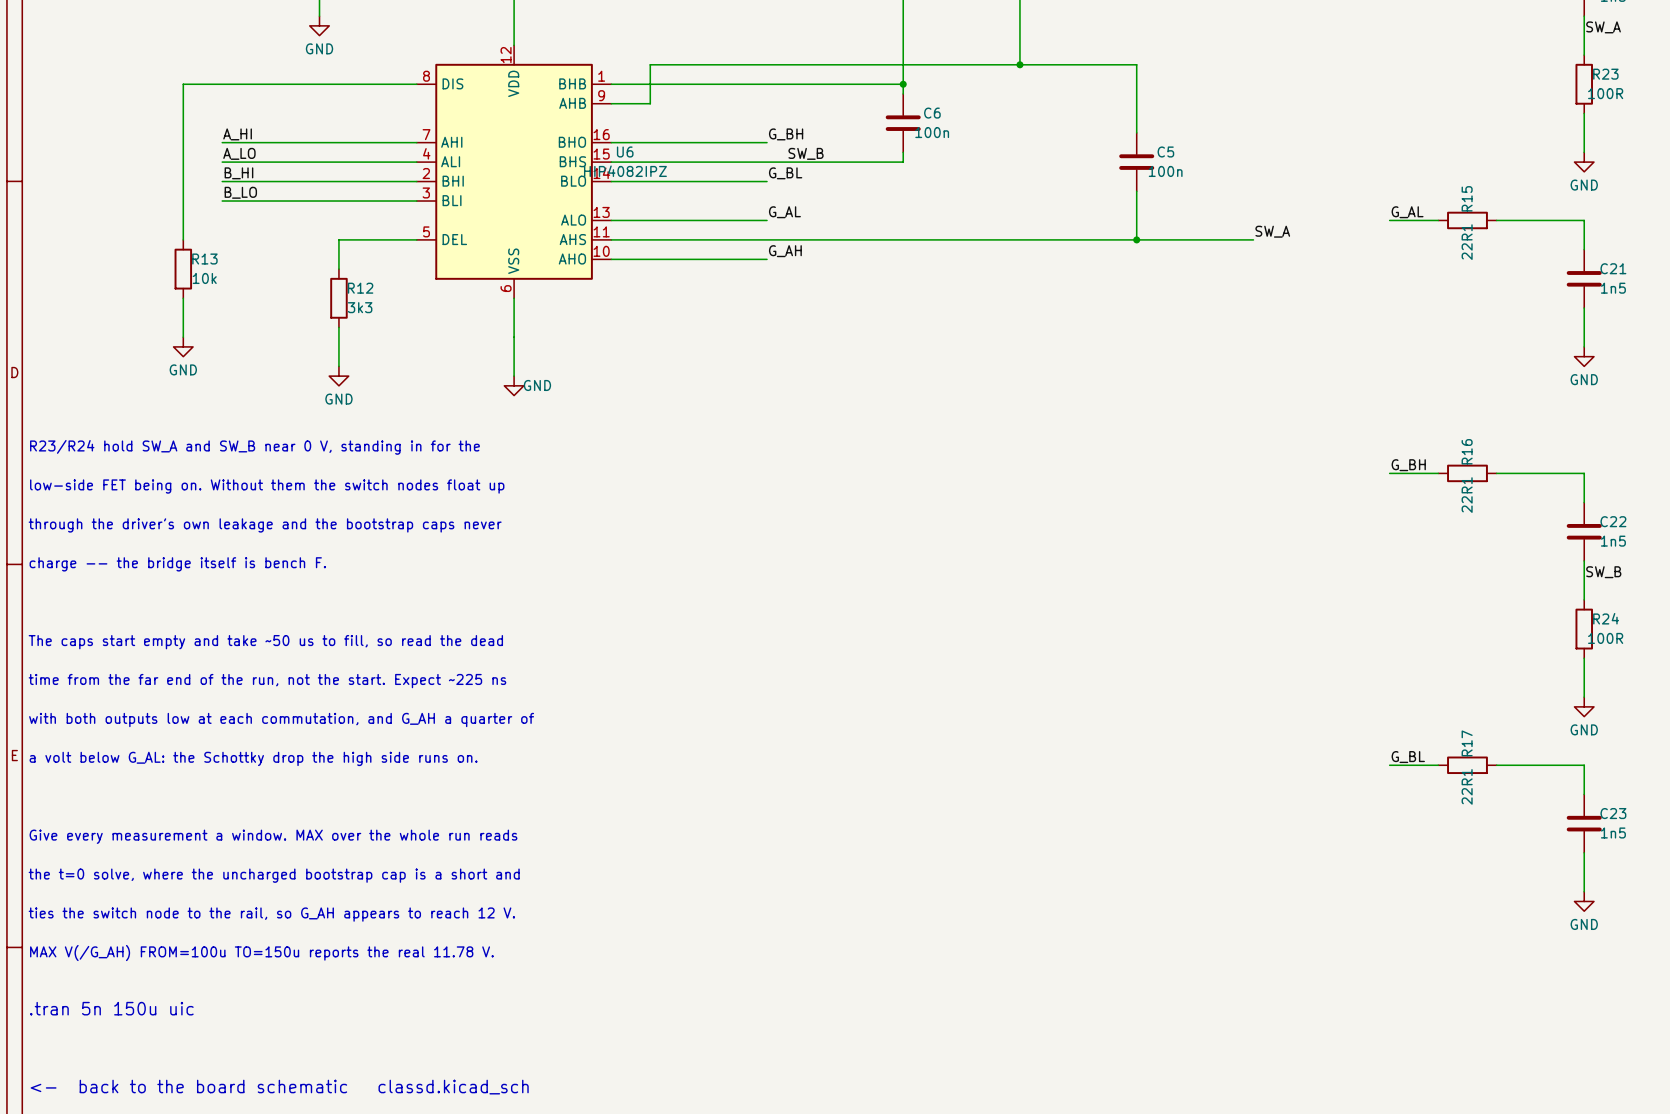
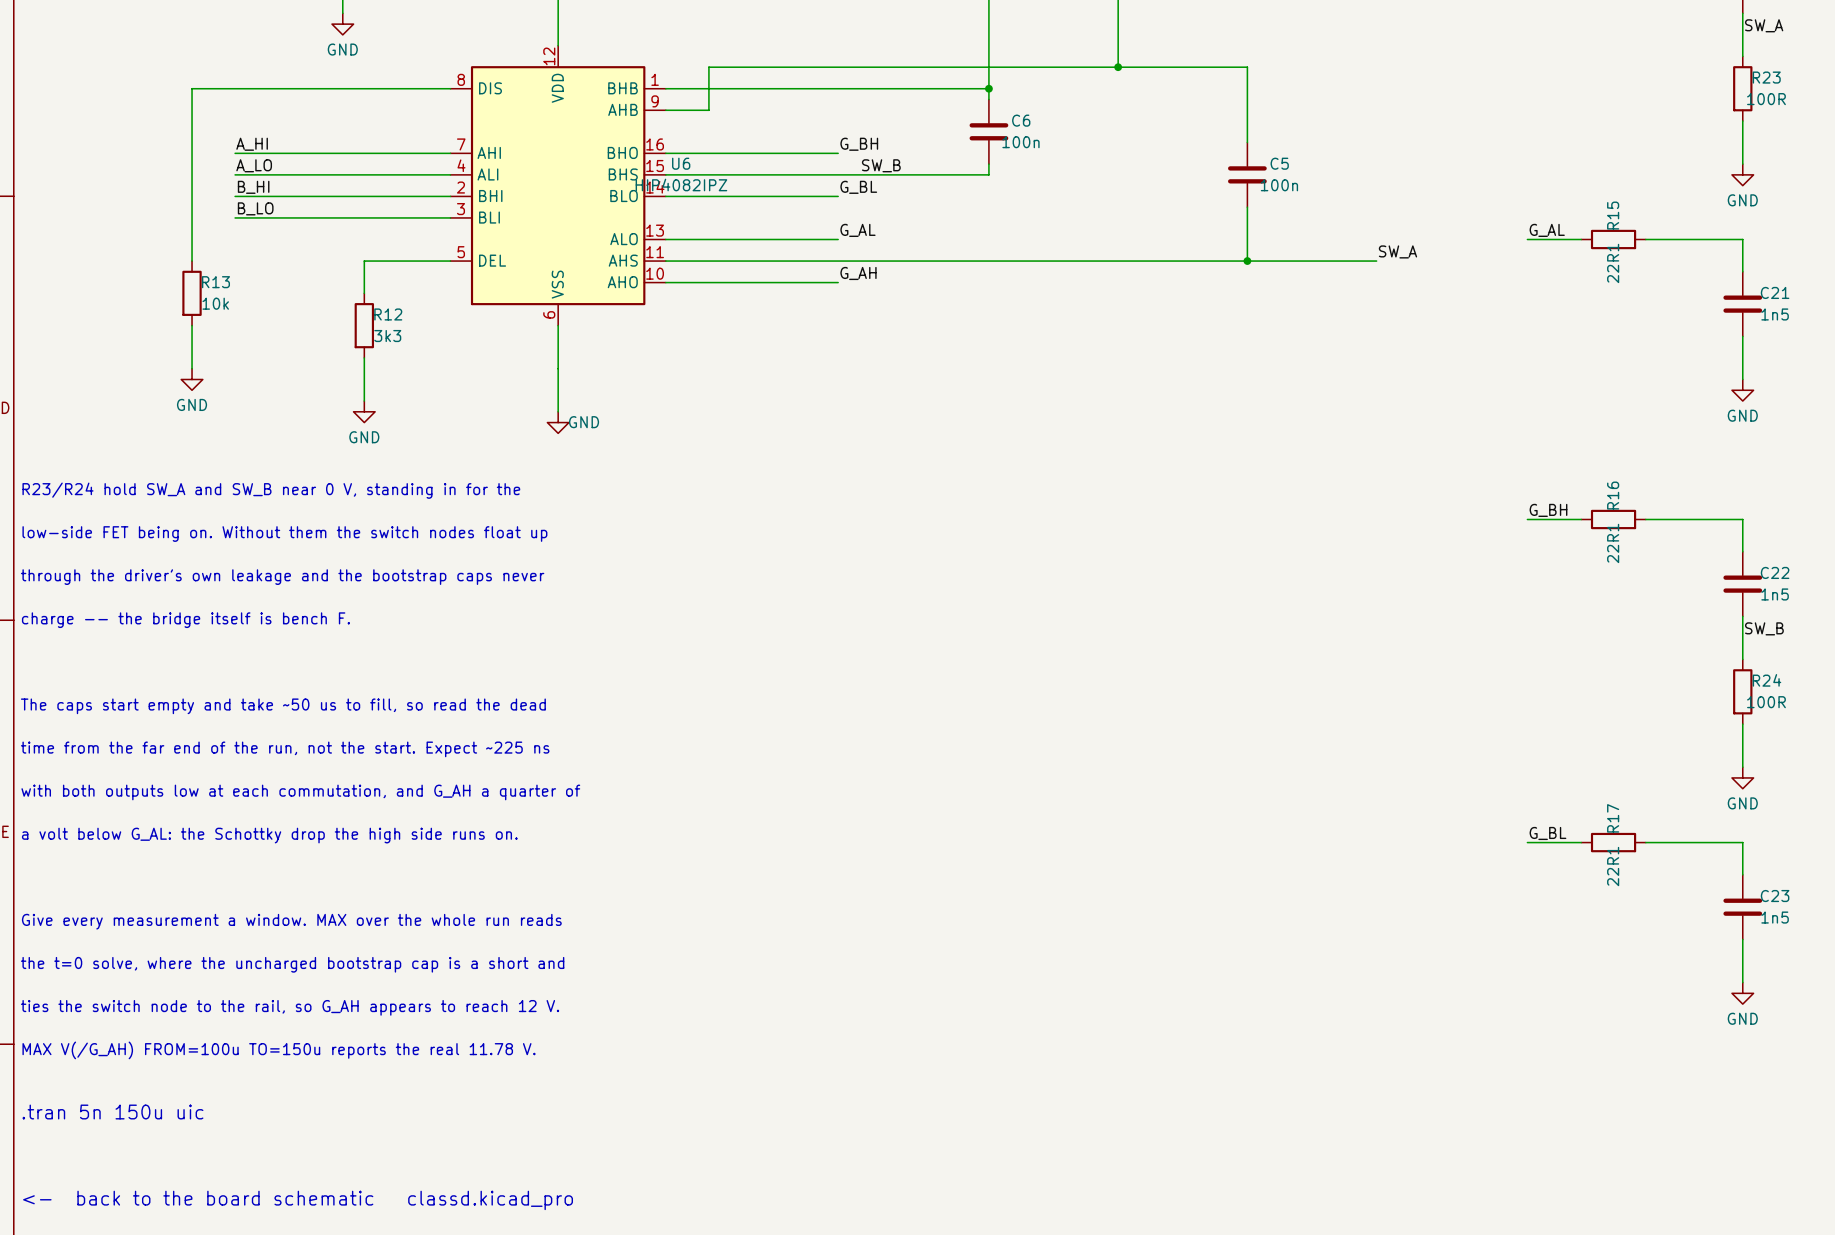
text: <- back to the board schematic classd.kicad_sch (279, 1087) -> <- back to the board schematic classd.kicad_pro (298, 1200)

